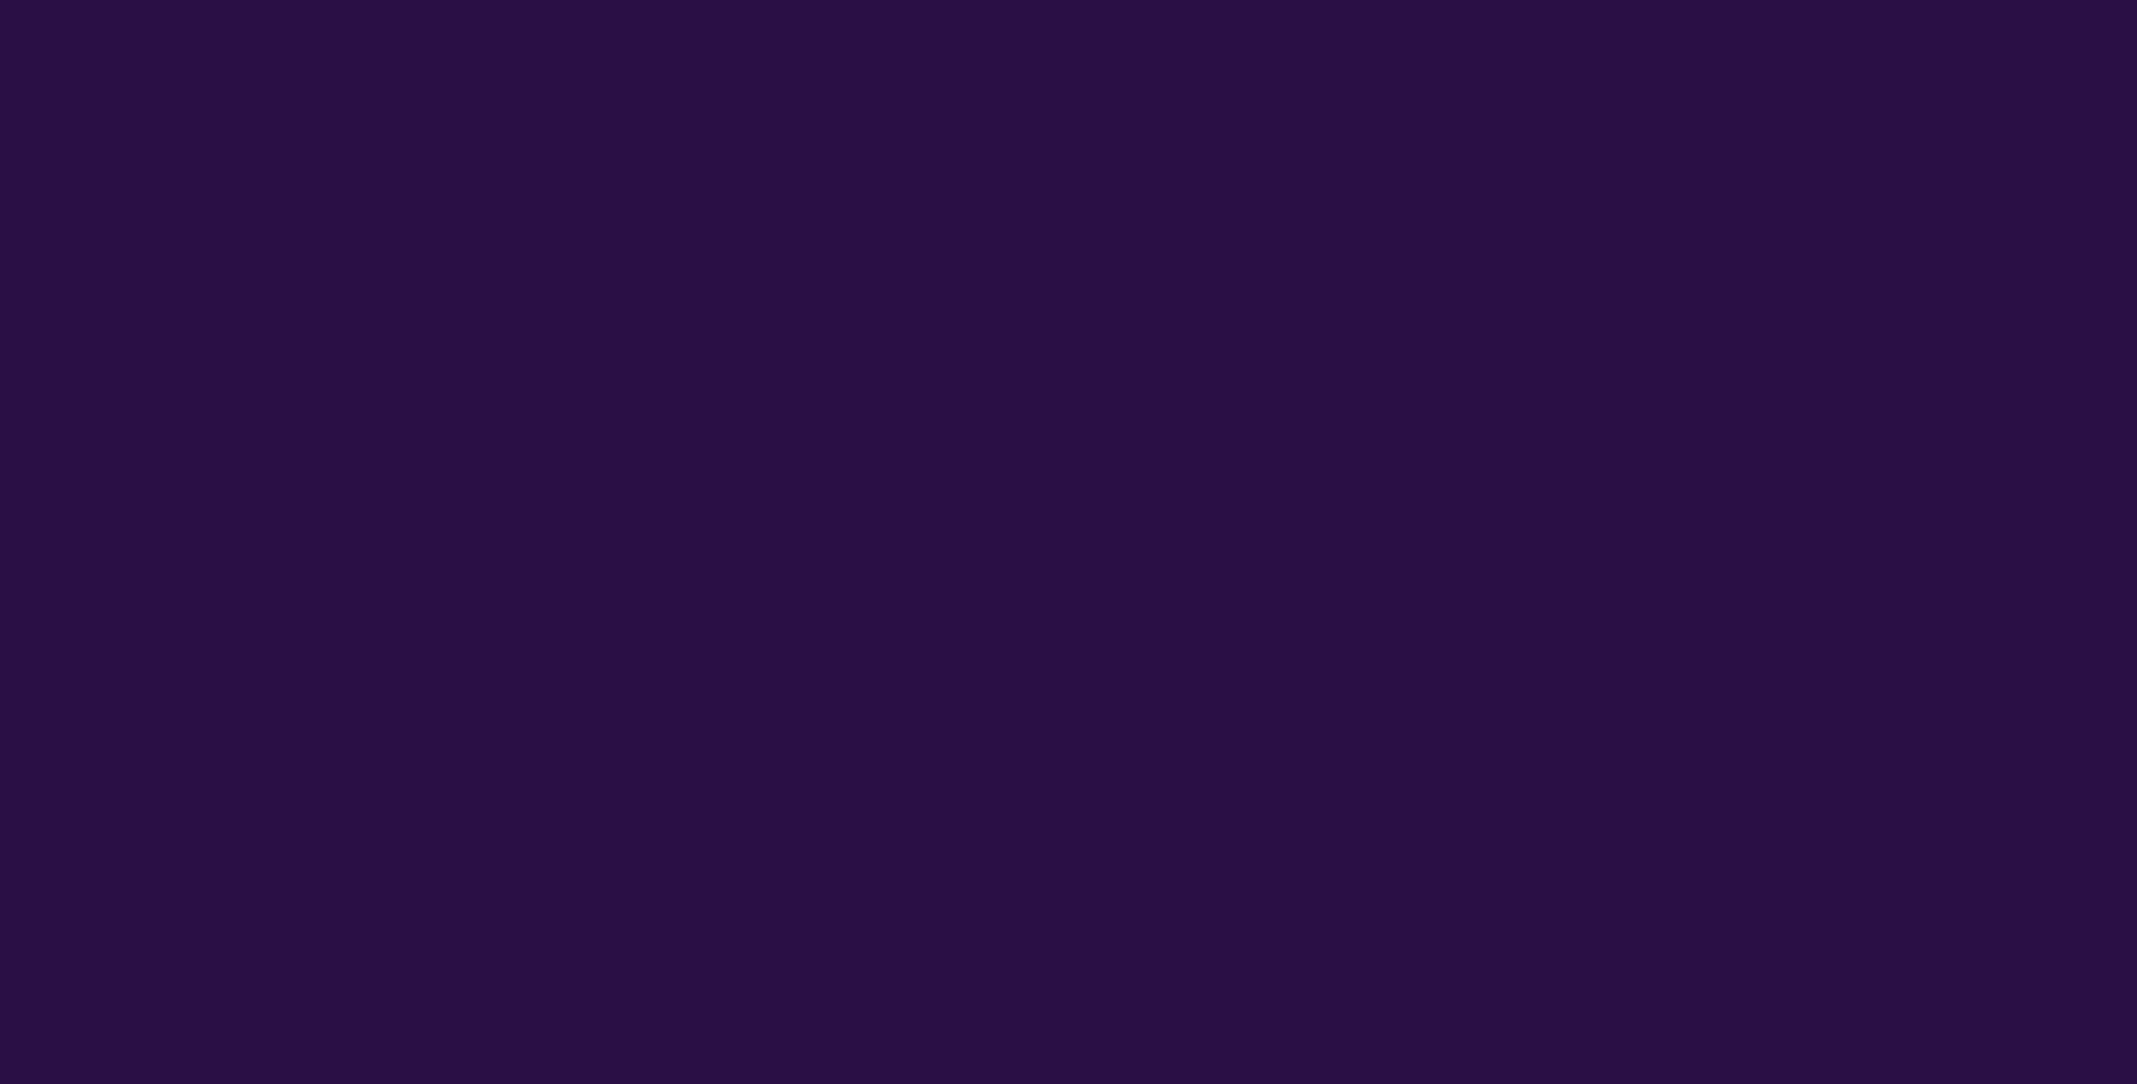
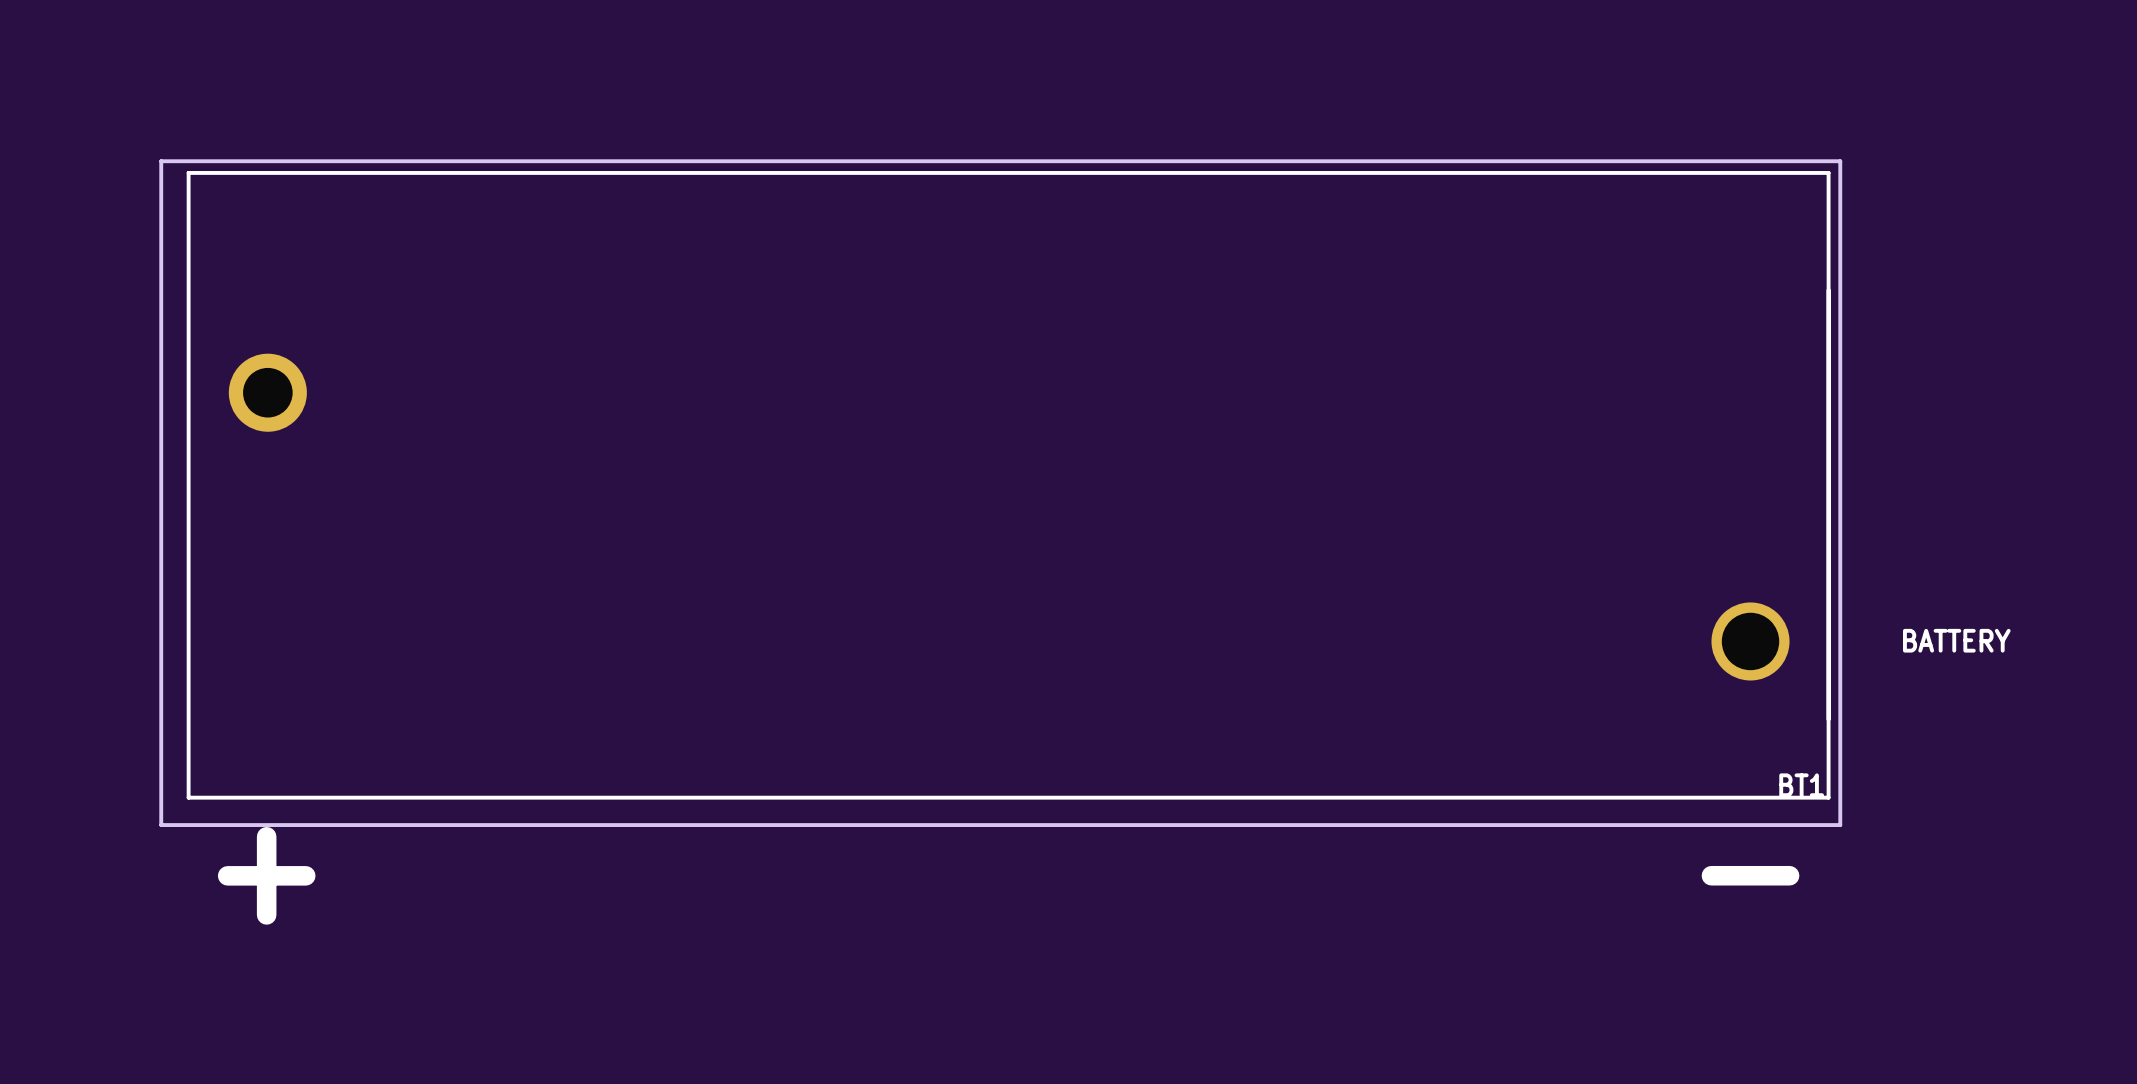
board edge: none -> (1840, 161) (1840, 825) (161, 825) (161, 161) (1840, 161)
BT1: none -> BATTERY (1008, 547)

